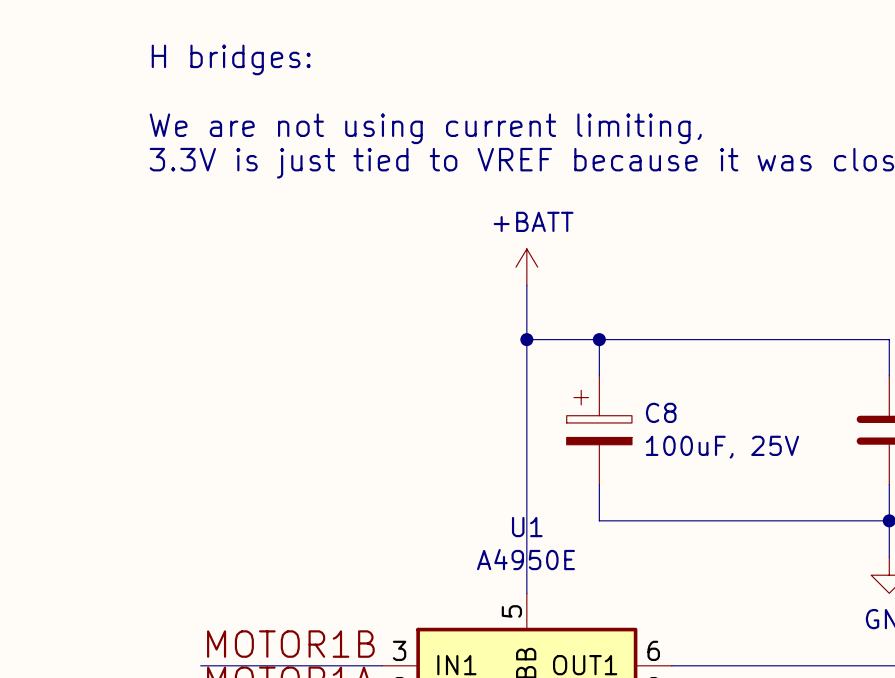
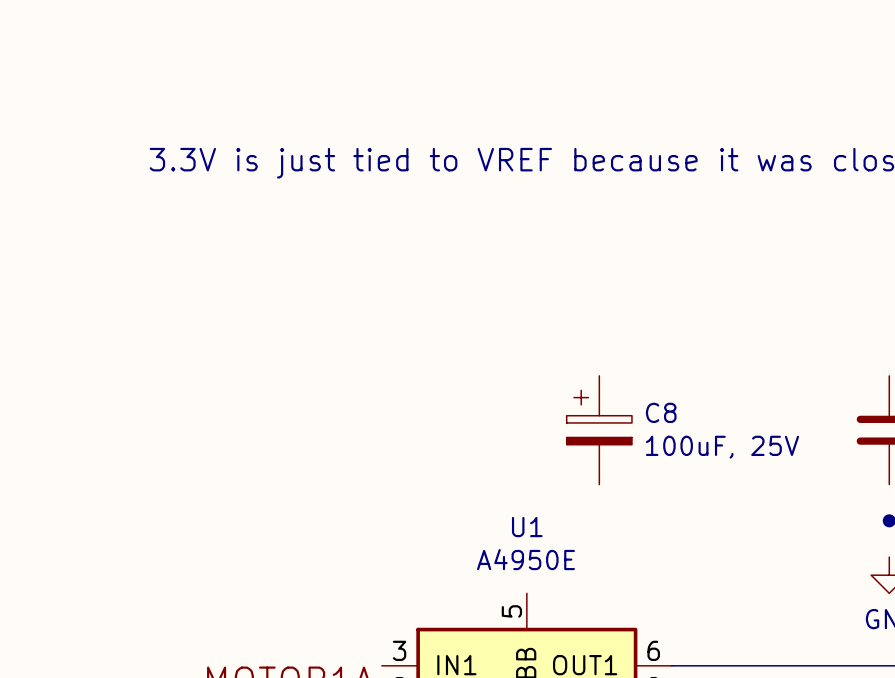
text: H bridges: (231, 59) -> none
text: We are not using current limiting, (425, 128) -> none
power symbol: +BATT (526, 267) -> none
wire: (526, 285) (526, 593) -> none
wire: (526, 339) (889, 339) (889, 375) -> none
junction: (526, 339) -> none
wire: (599, 339) (599, 375) -> none
junction: (599, 339) -> none
wire: (599, 484) (599, 520) (889, 520) -> none
wire: (889, 484) (889, 557) -> none
label: MOTOR1B (290, 644) -> none
wire: (200, 665) (381, 665) -> none

